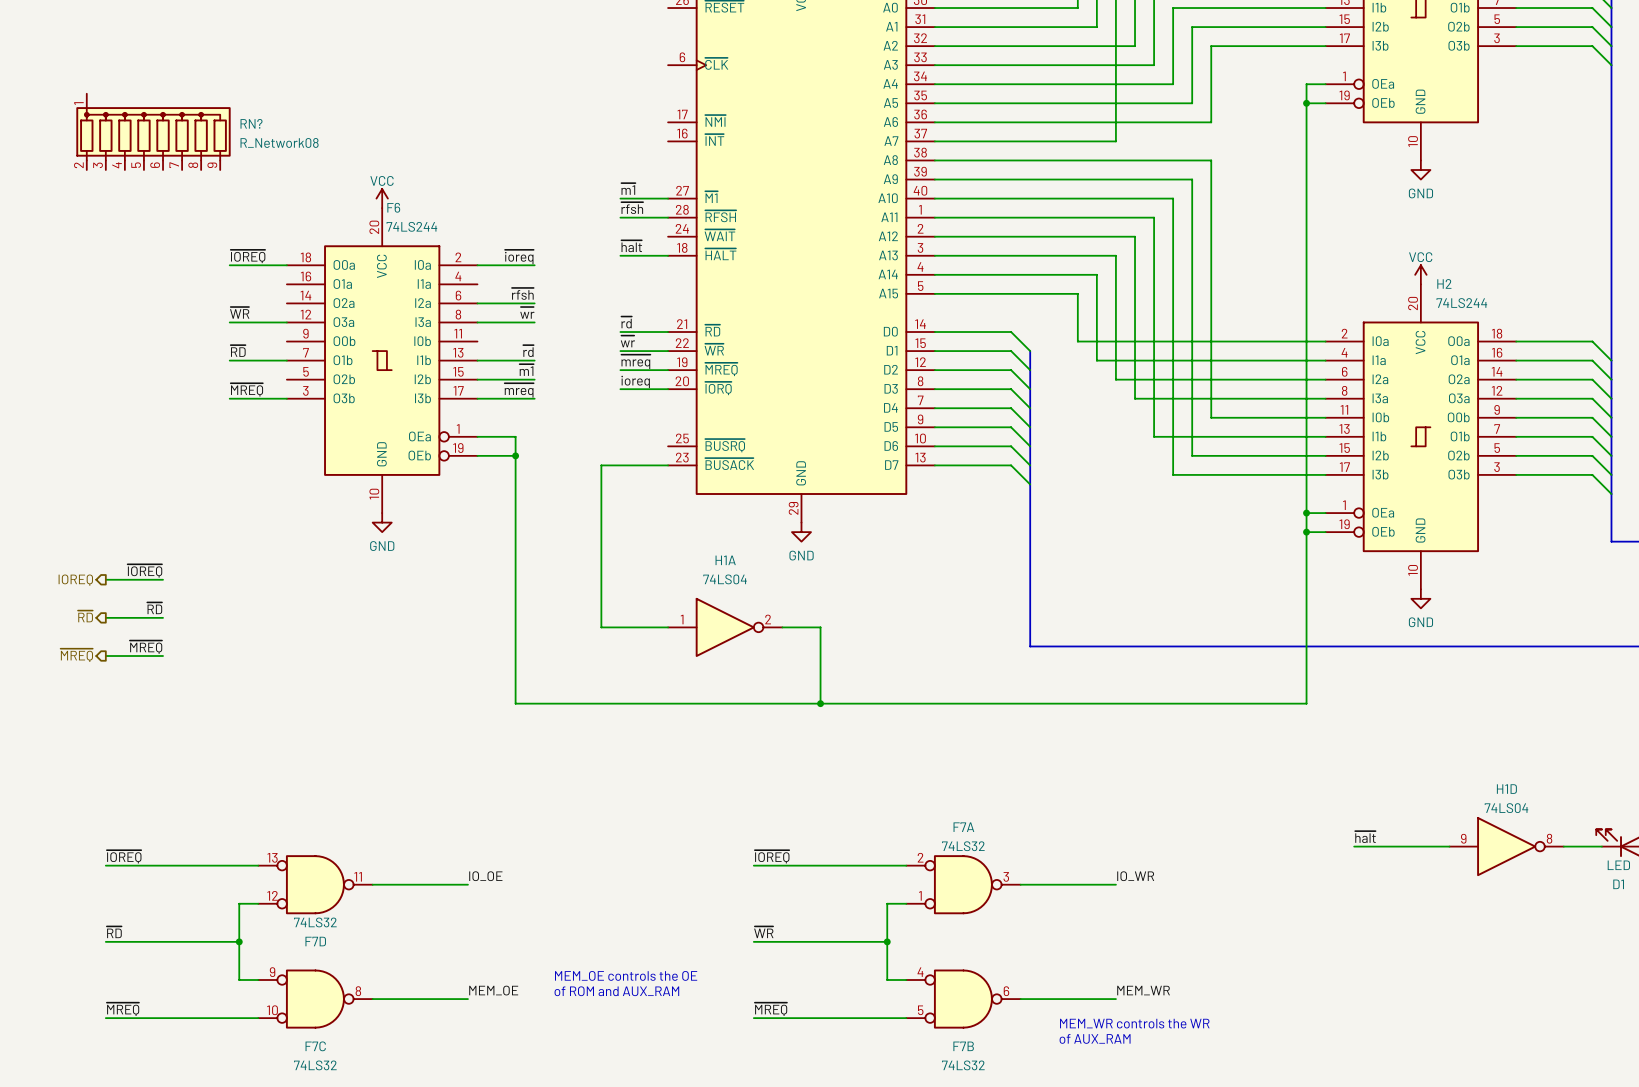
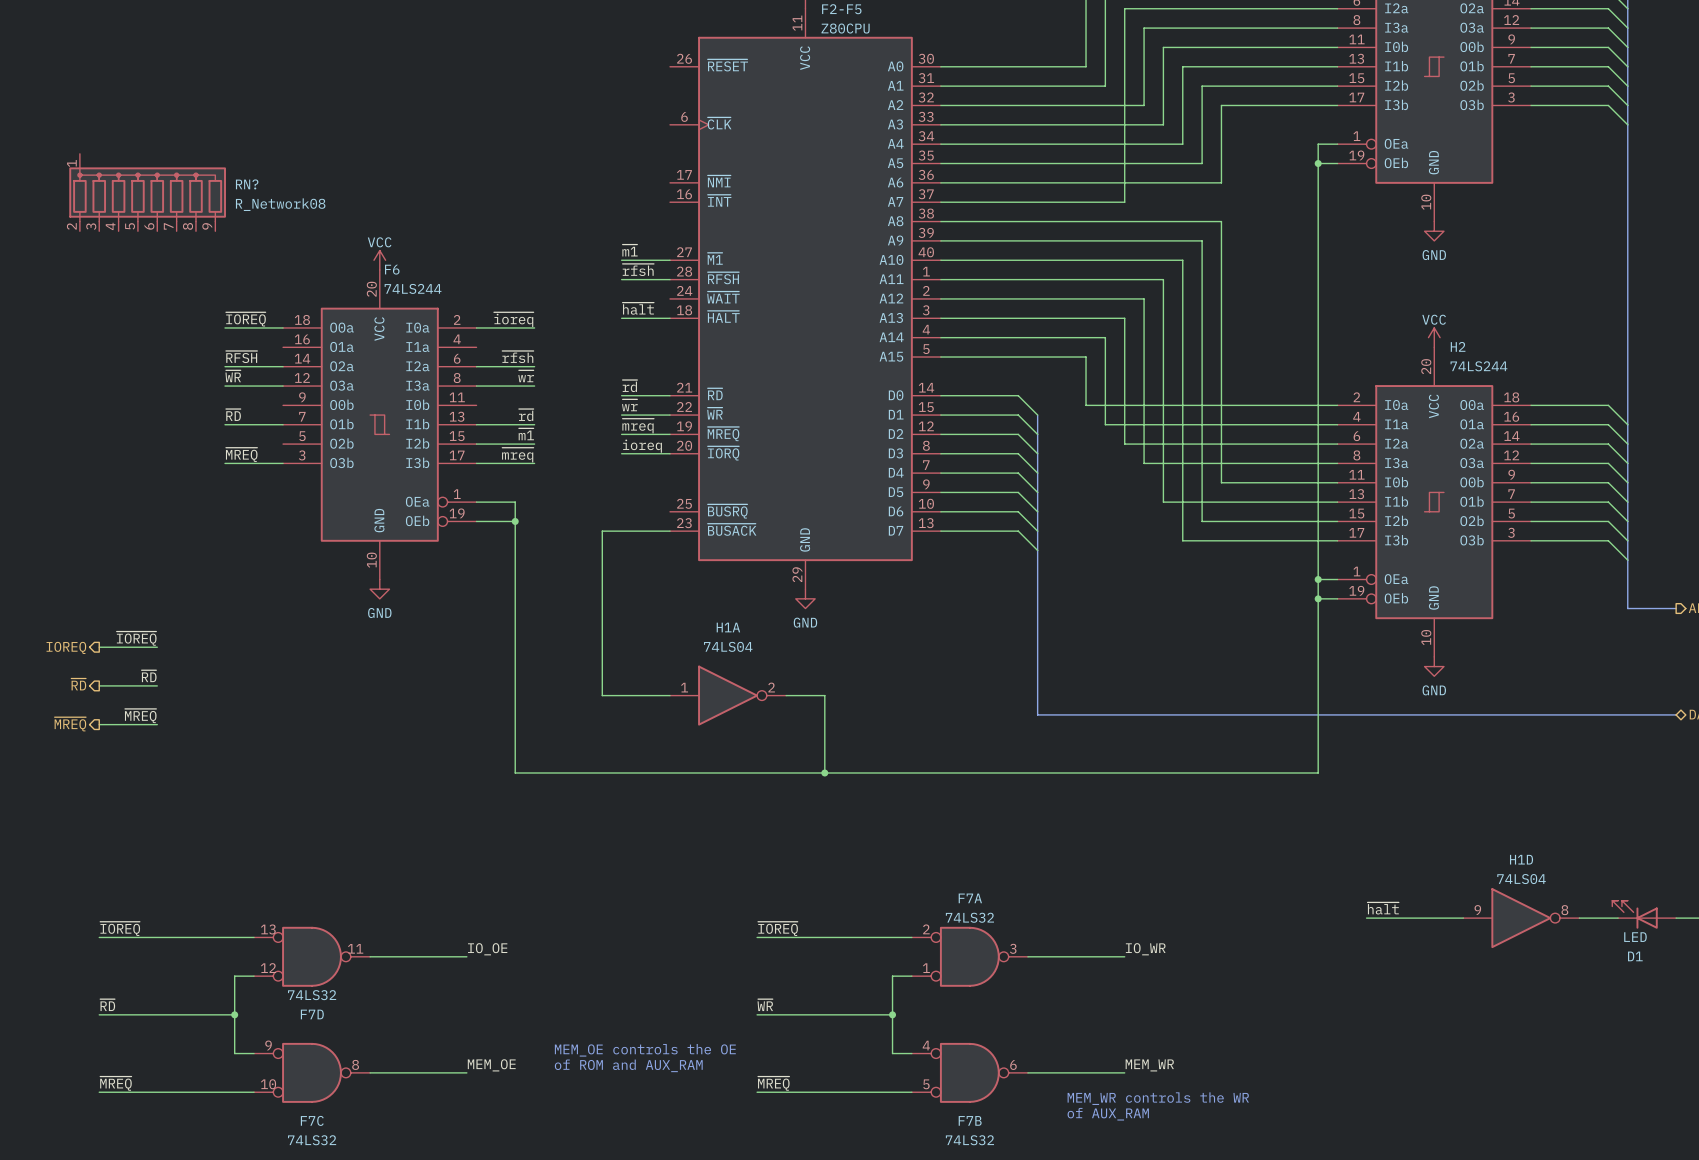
label: none -> ~{RFSH} (241, 357)
wire: none -> (225, 366) (283, 366)

